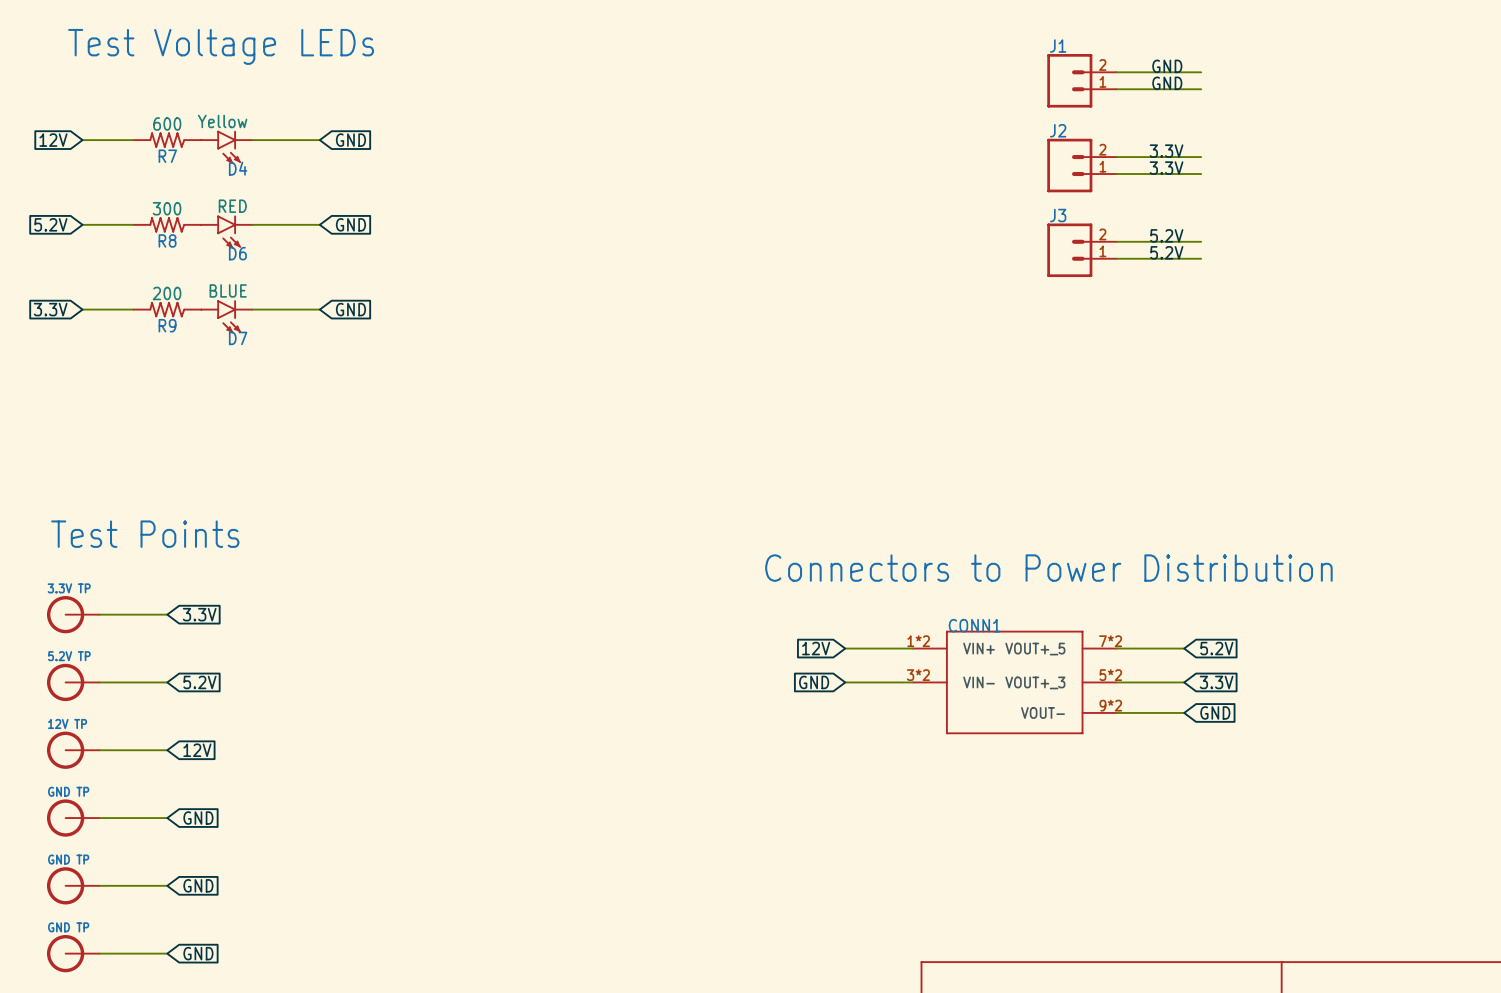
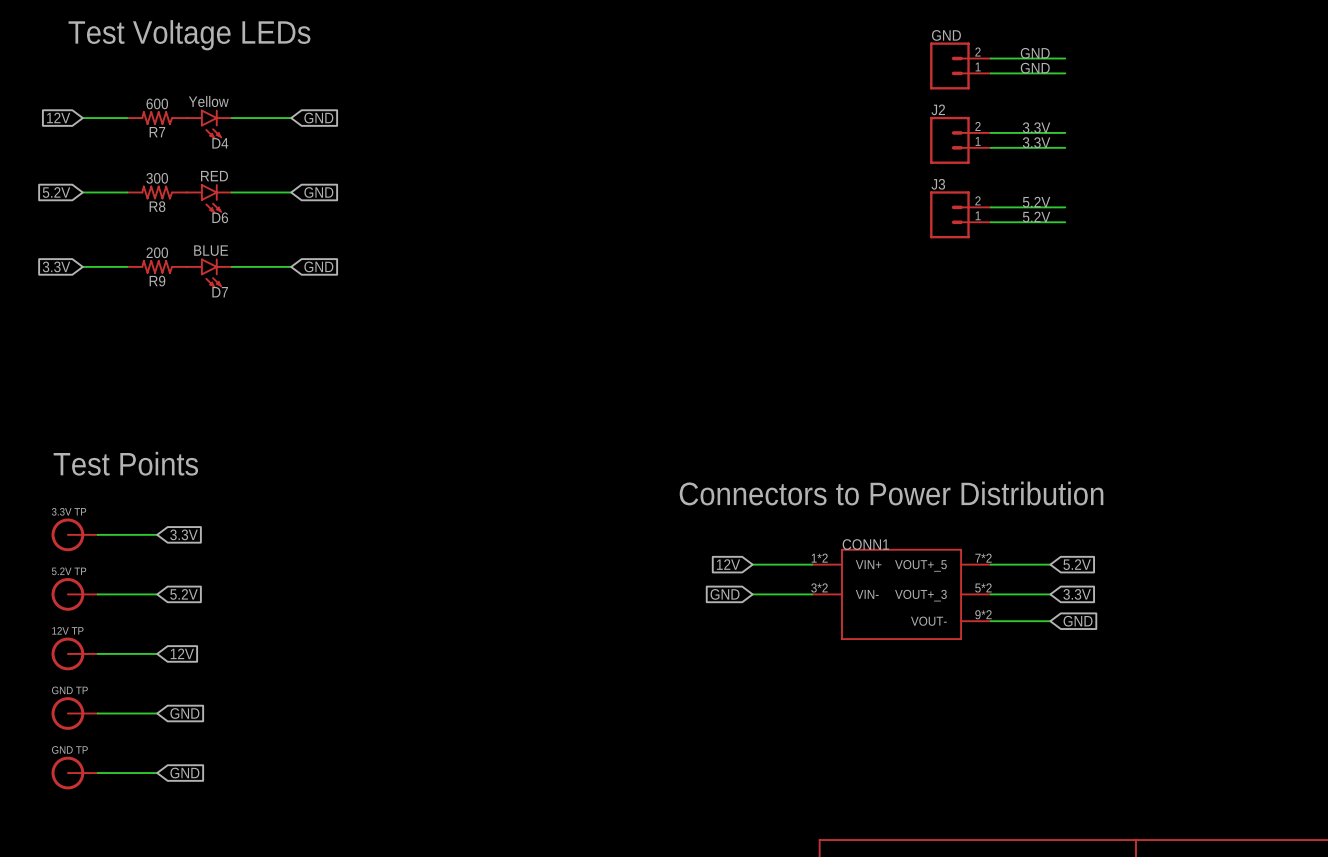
J1 name: J1 (1058, 46) -> GND (946, 35)
part: (73, 953) -> none
wire: (99, 953) (167, 953) -> none
global label: GND (198, 953) -> none

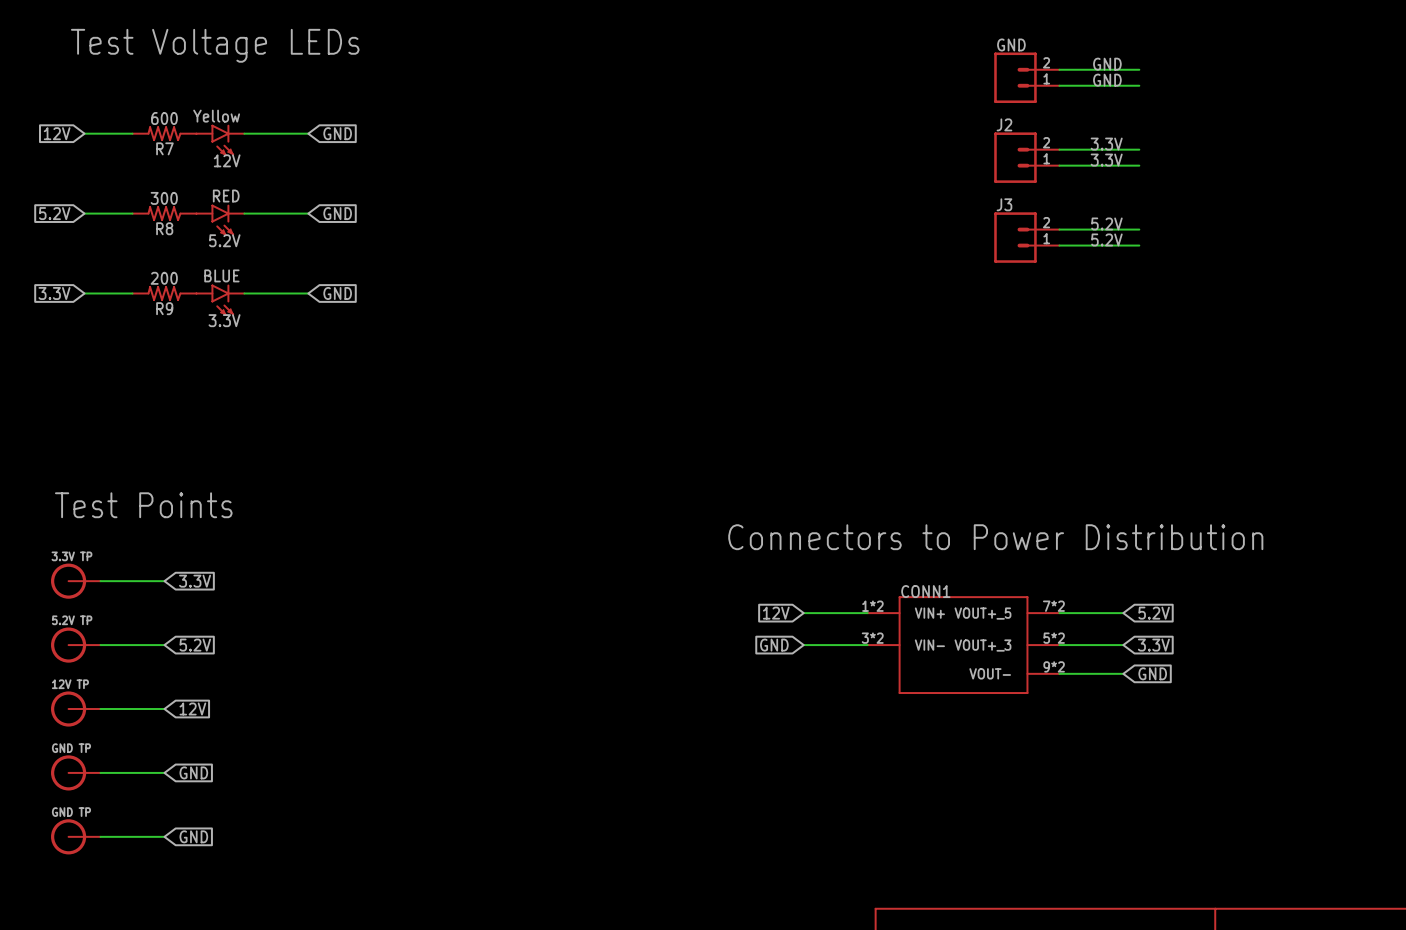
D4 name: D4 (220, 143) -> 12V (227, 160)
D6 name: D6 (220, 217) -> 5.2V (224, 240)
D7 name: D7 (220, 292) -> 3.3V (224, 320)

